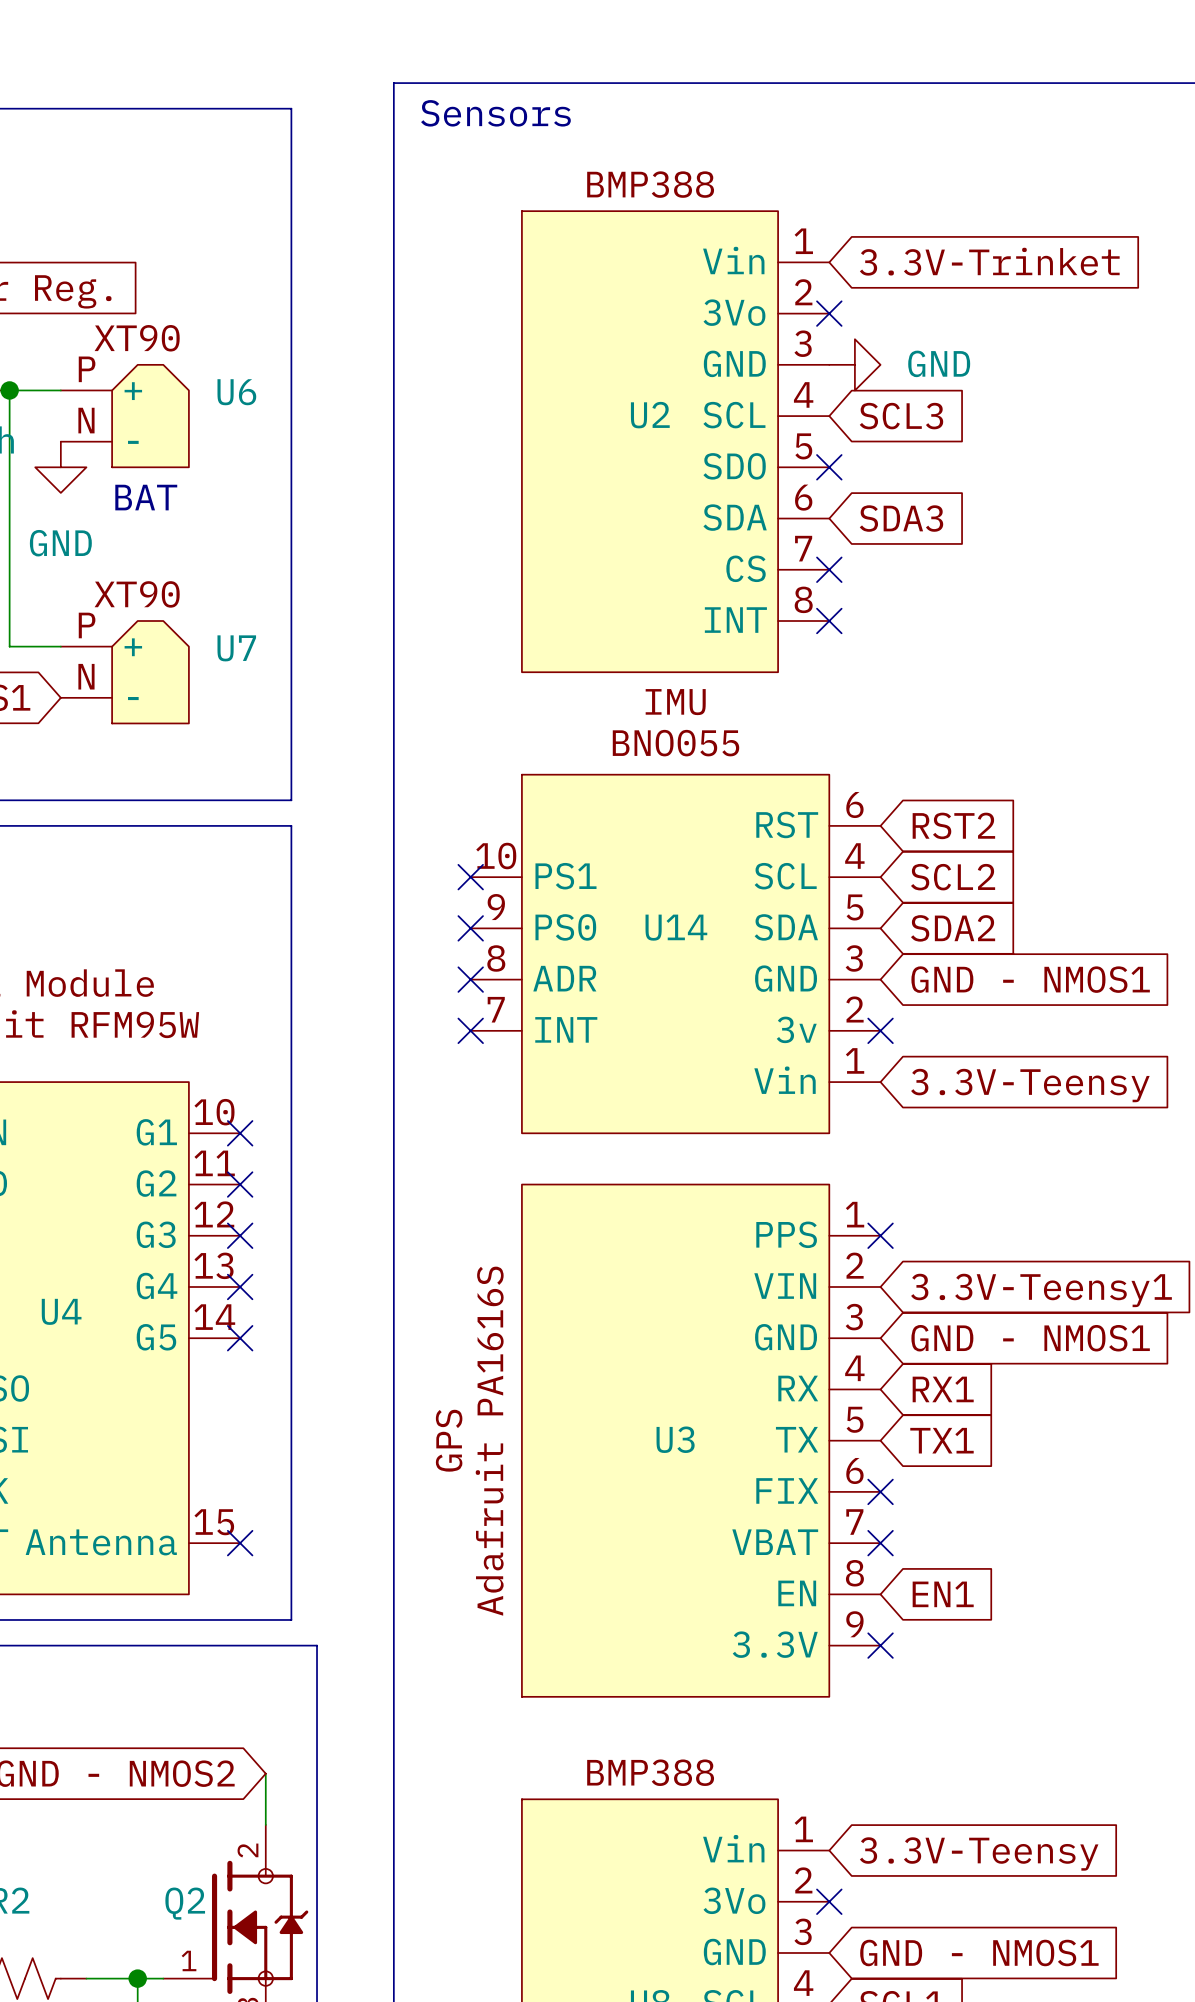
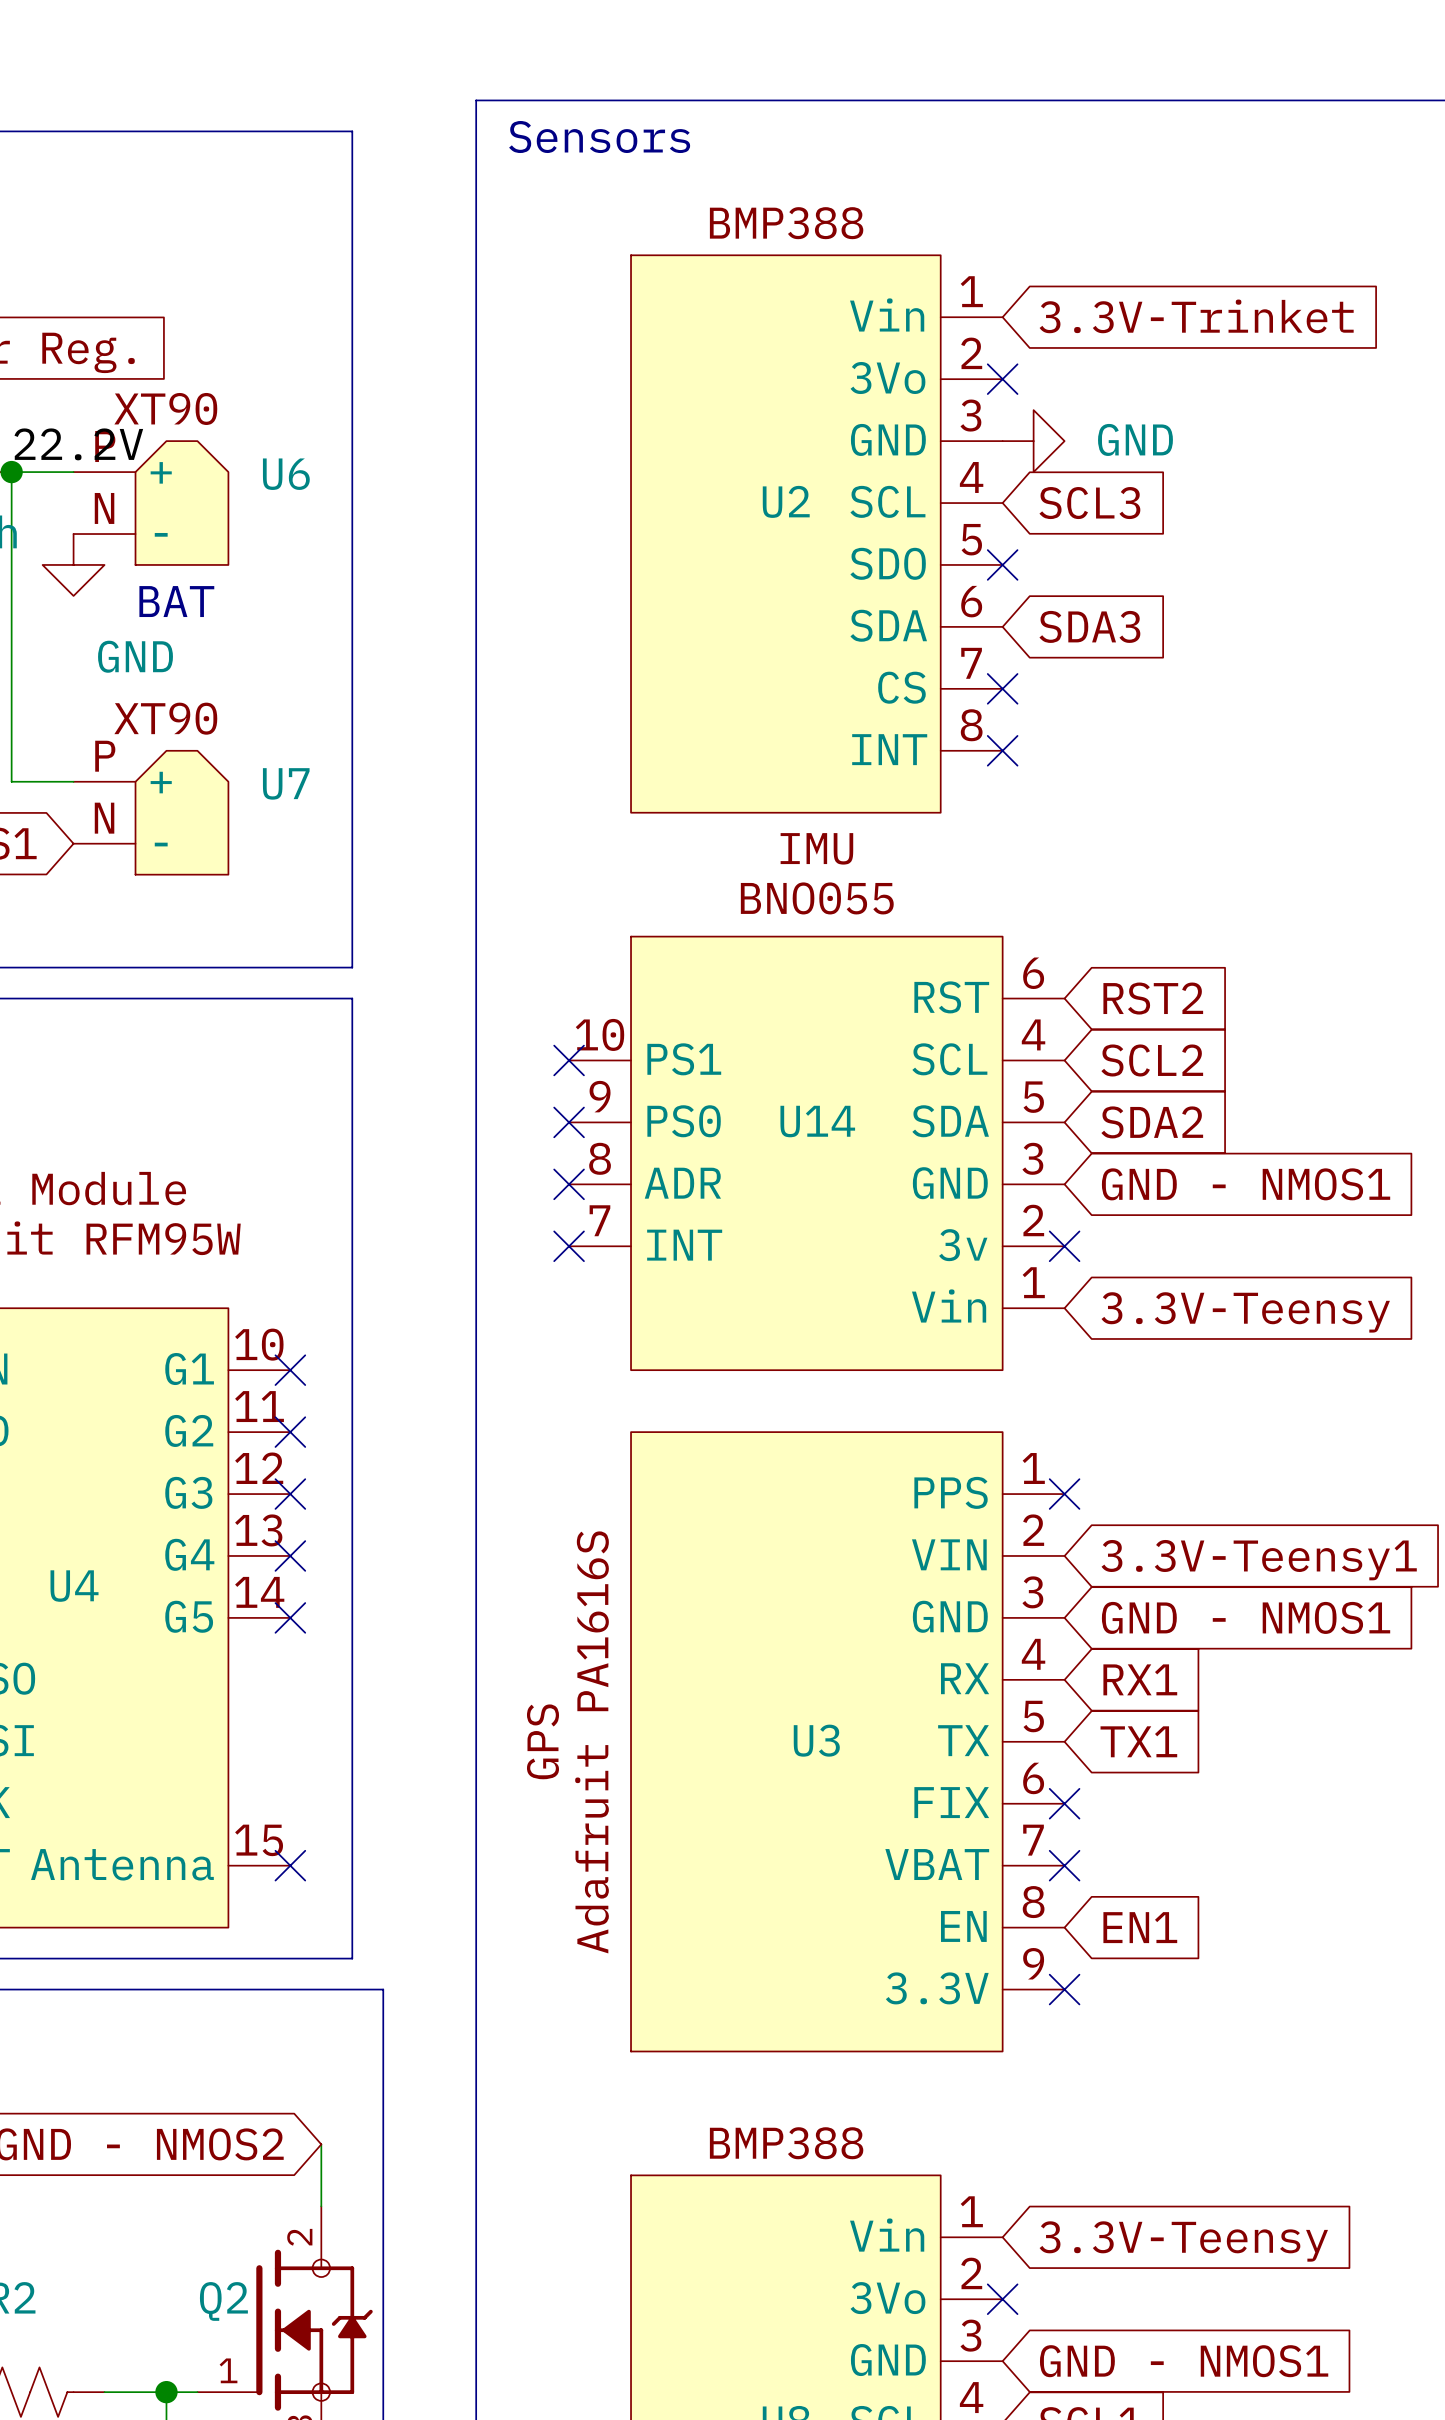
label: none -> 22.2V (78, 444)
power symbol text position: GND (60, 543) -> GND (135, 656)

